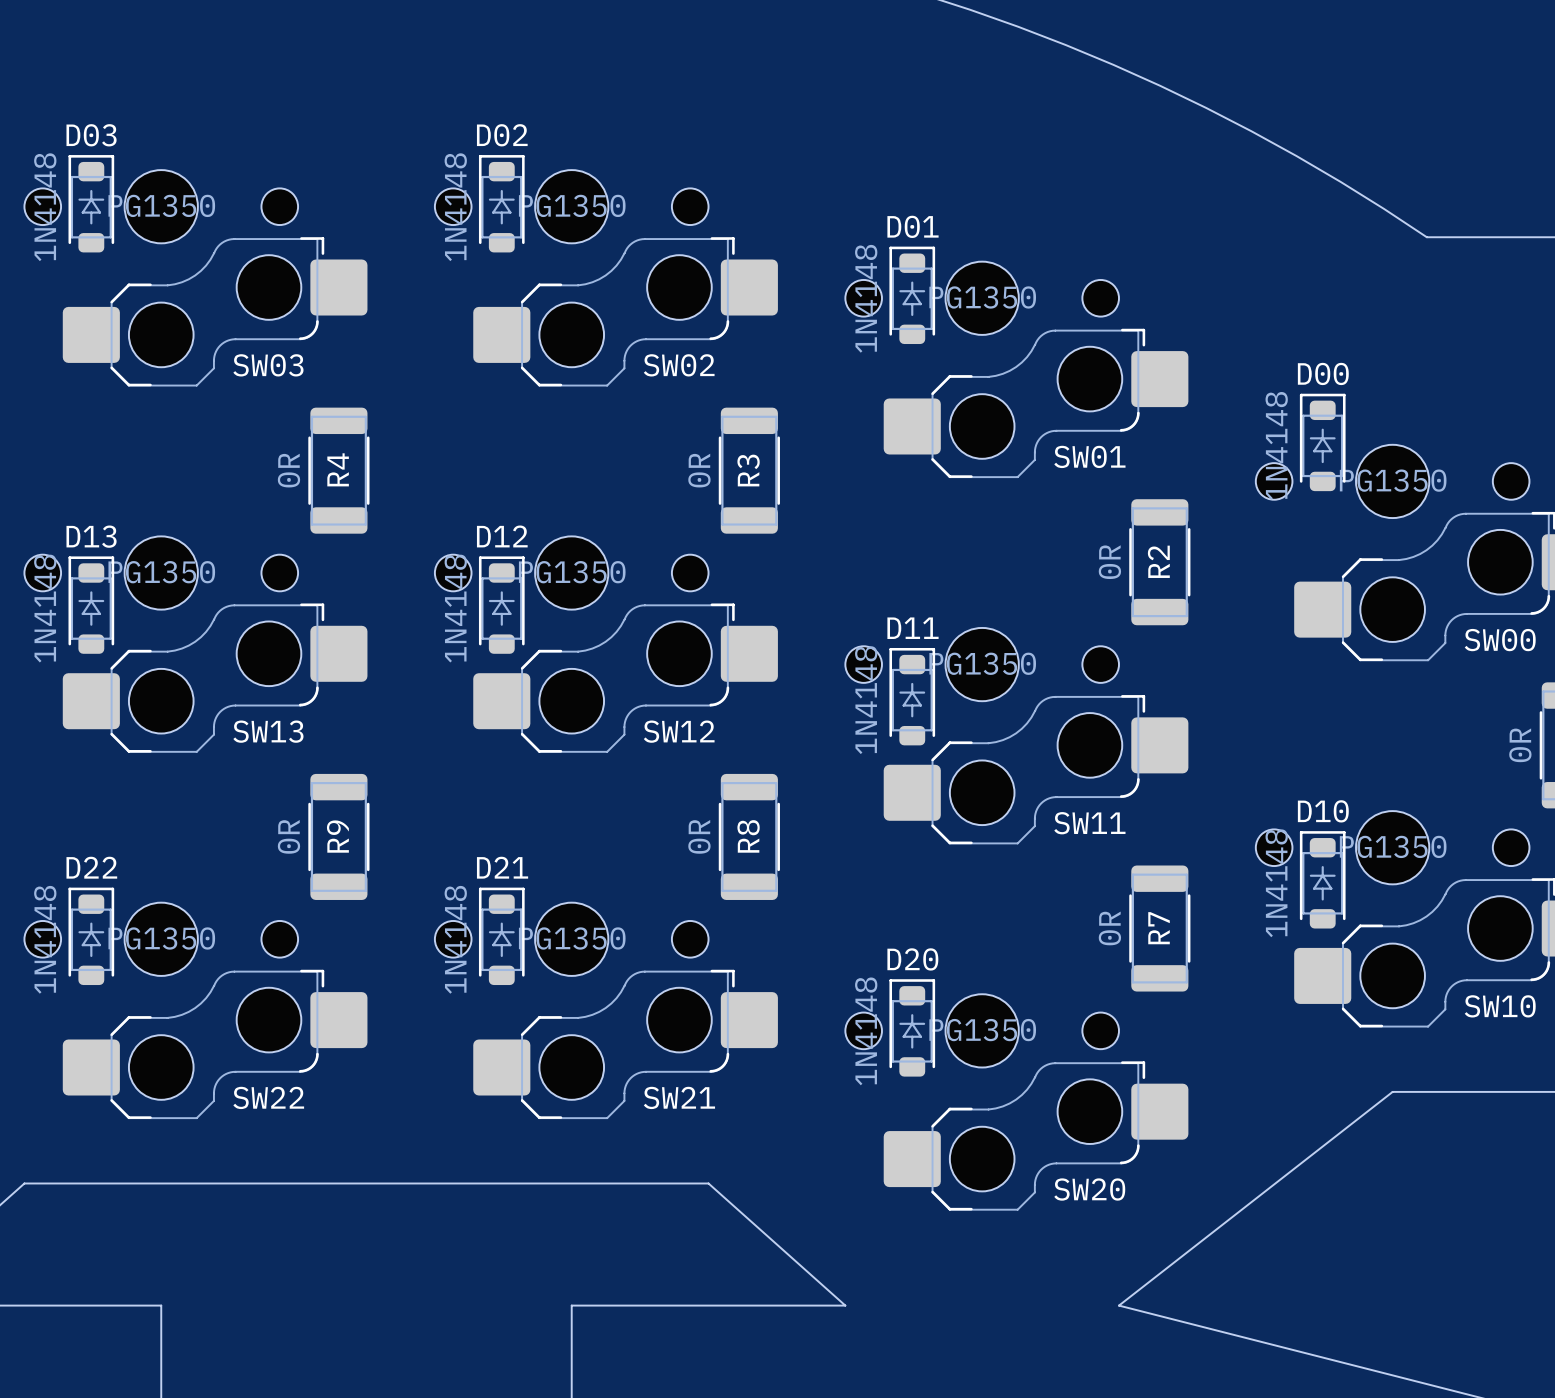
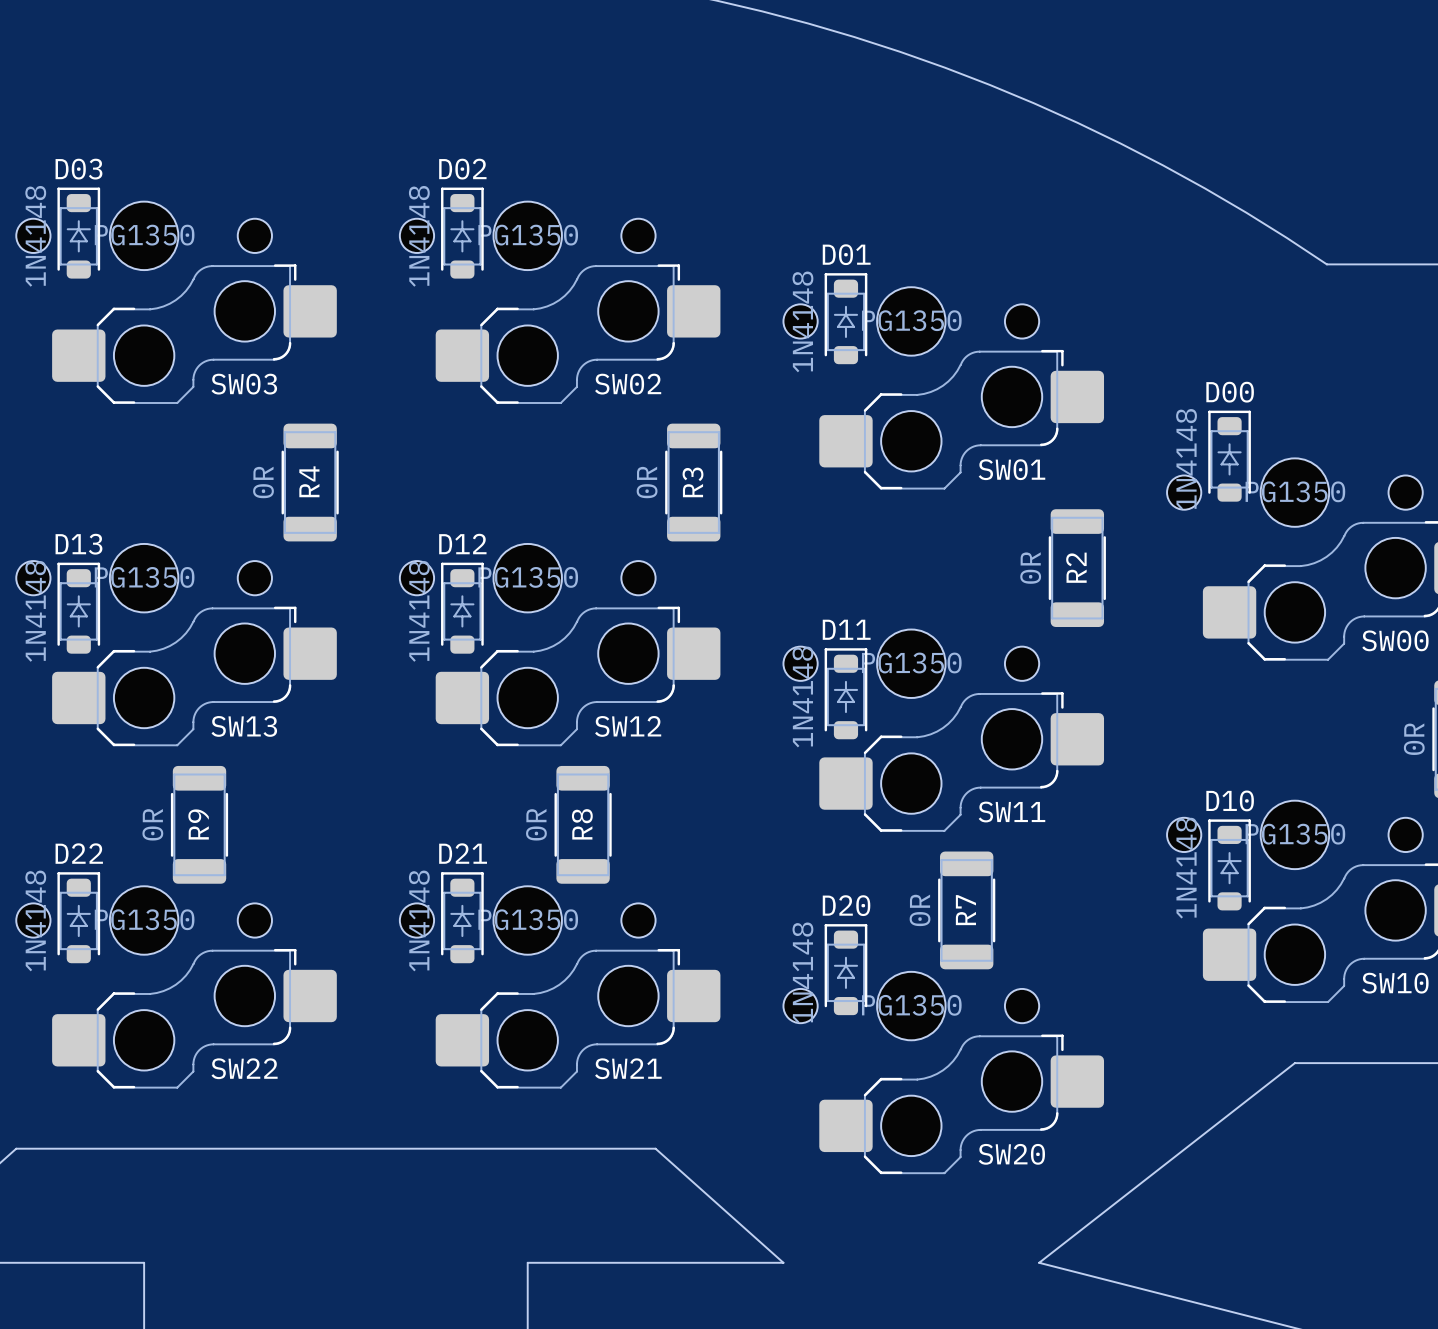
R9 position: (338, 836) -> (199, 824)
R8 position: (749, 836) -> (583, 824)
R7 position: (1159, 928) -> (966, 910)
D20 position: (912, 1027) -> (845, 969)

